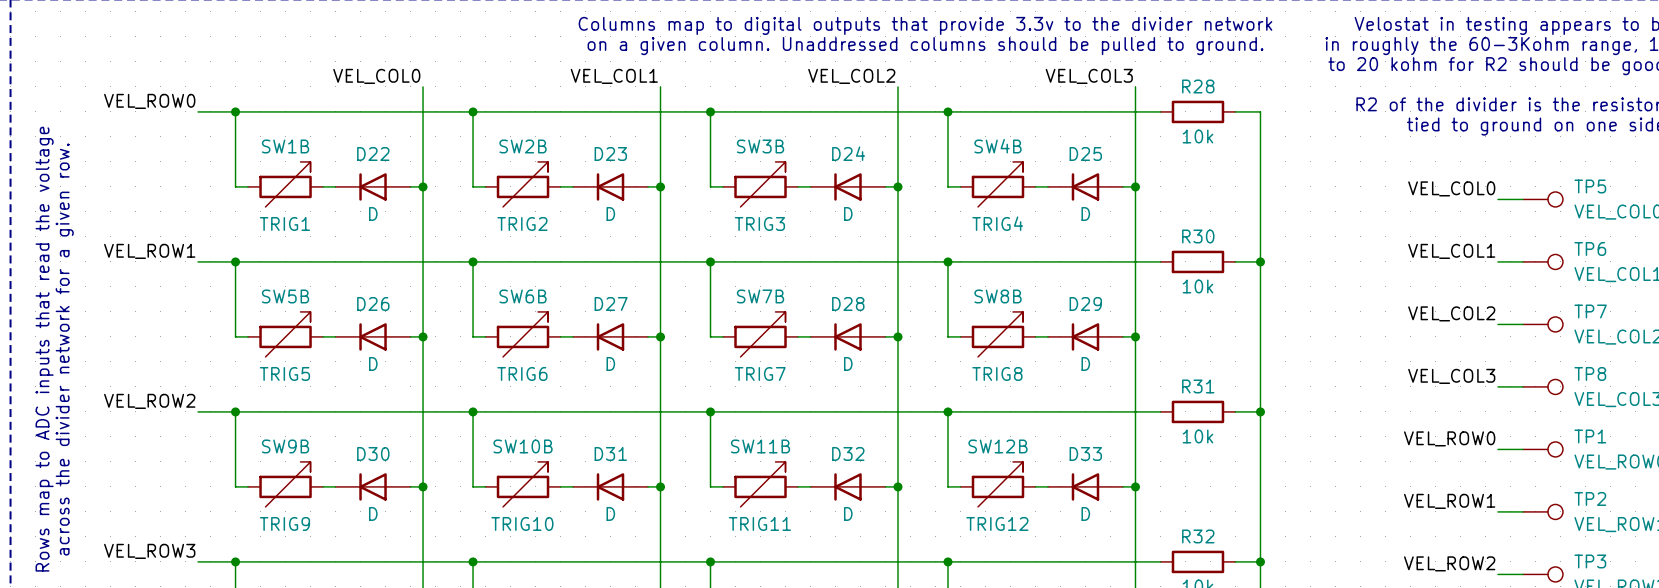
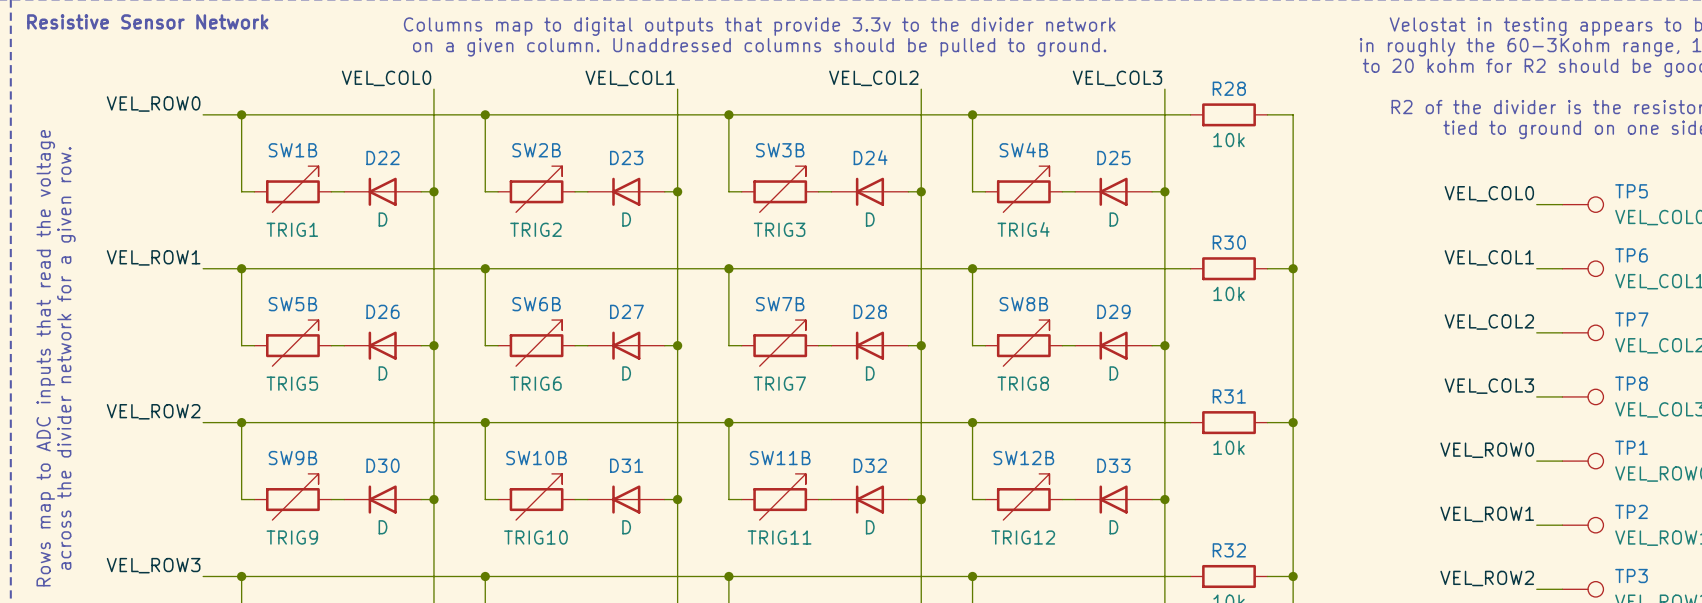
text: none -> Resistive Sensor Network (147, 21)
text position: Columns map to digital outputs that provide 3.3v to the divider network (925, 25) -> Columns map to digital outputs that provide 3.3v to the divider network (759, 26)
text position: on a given column. Unaddressed columns should be pulled to ground. (925, 46) -> on a given column. Unaddressed columns should be pulled to ground. (759, 47)

